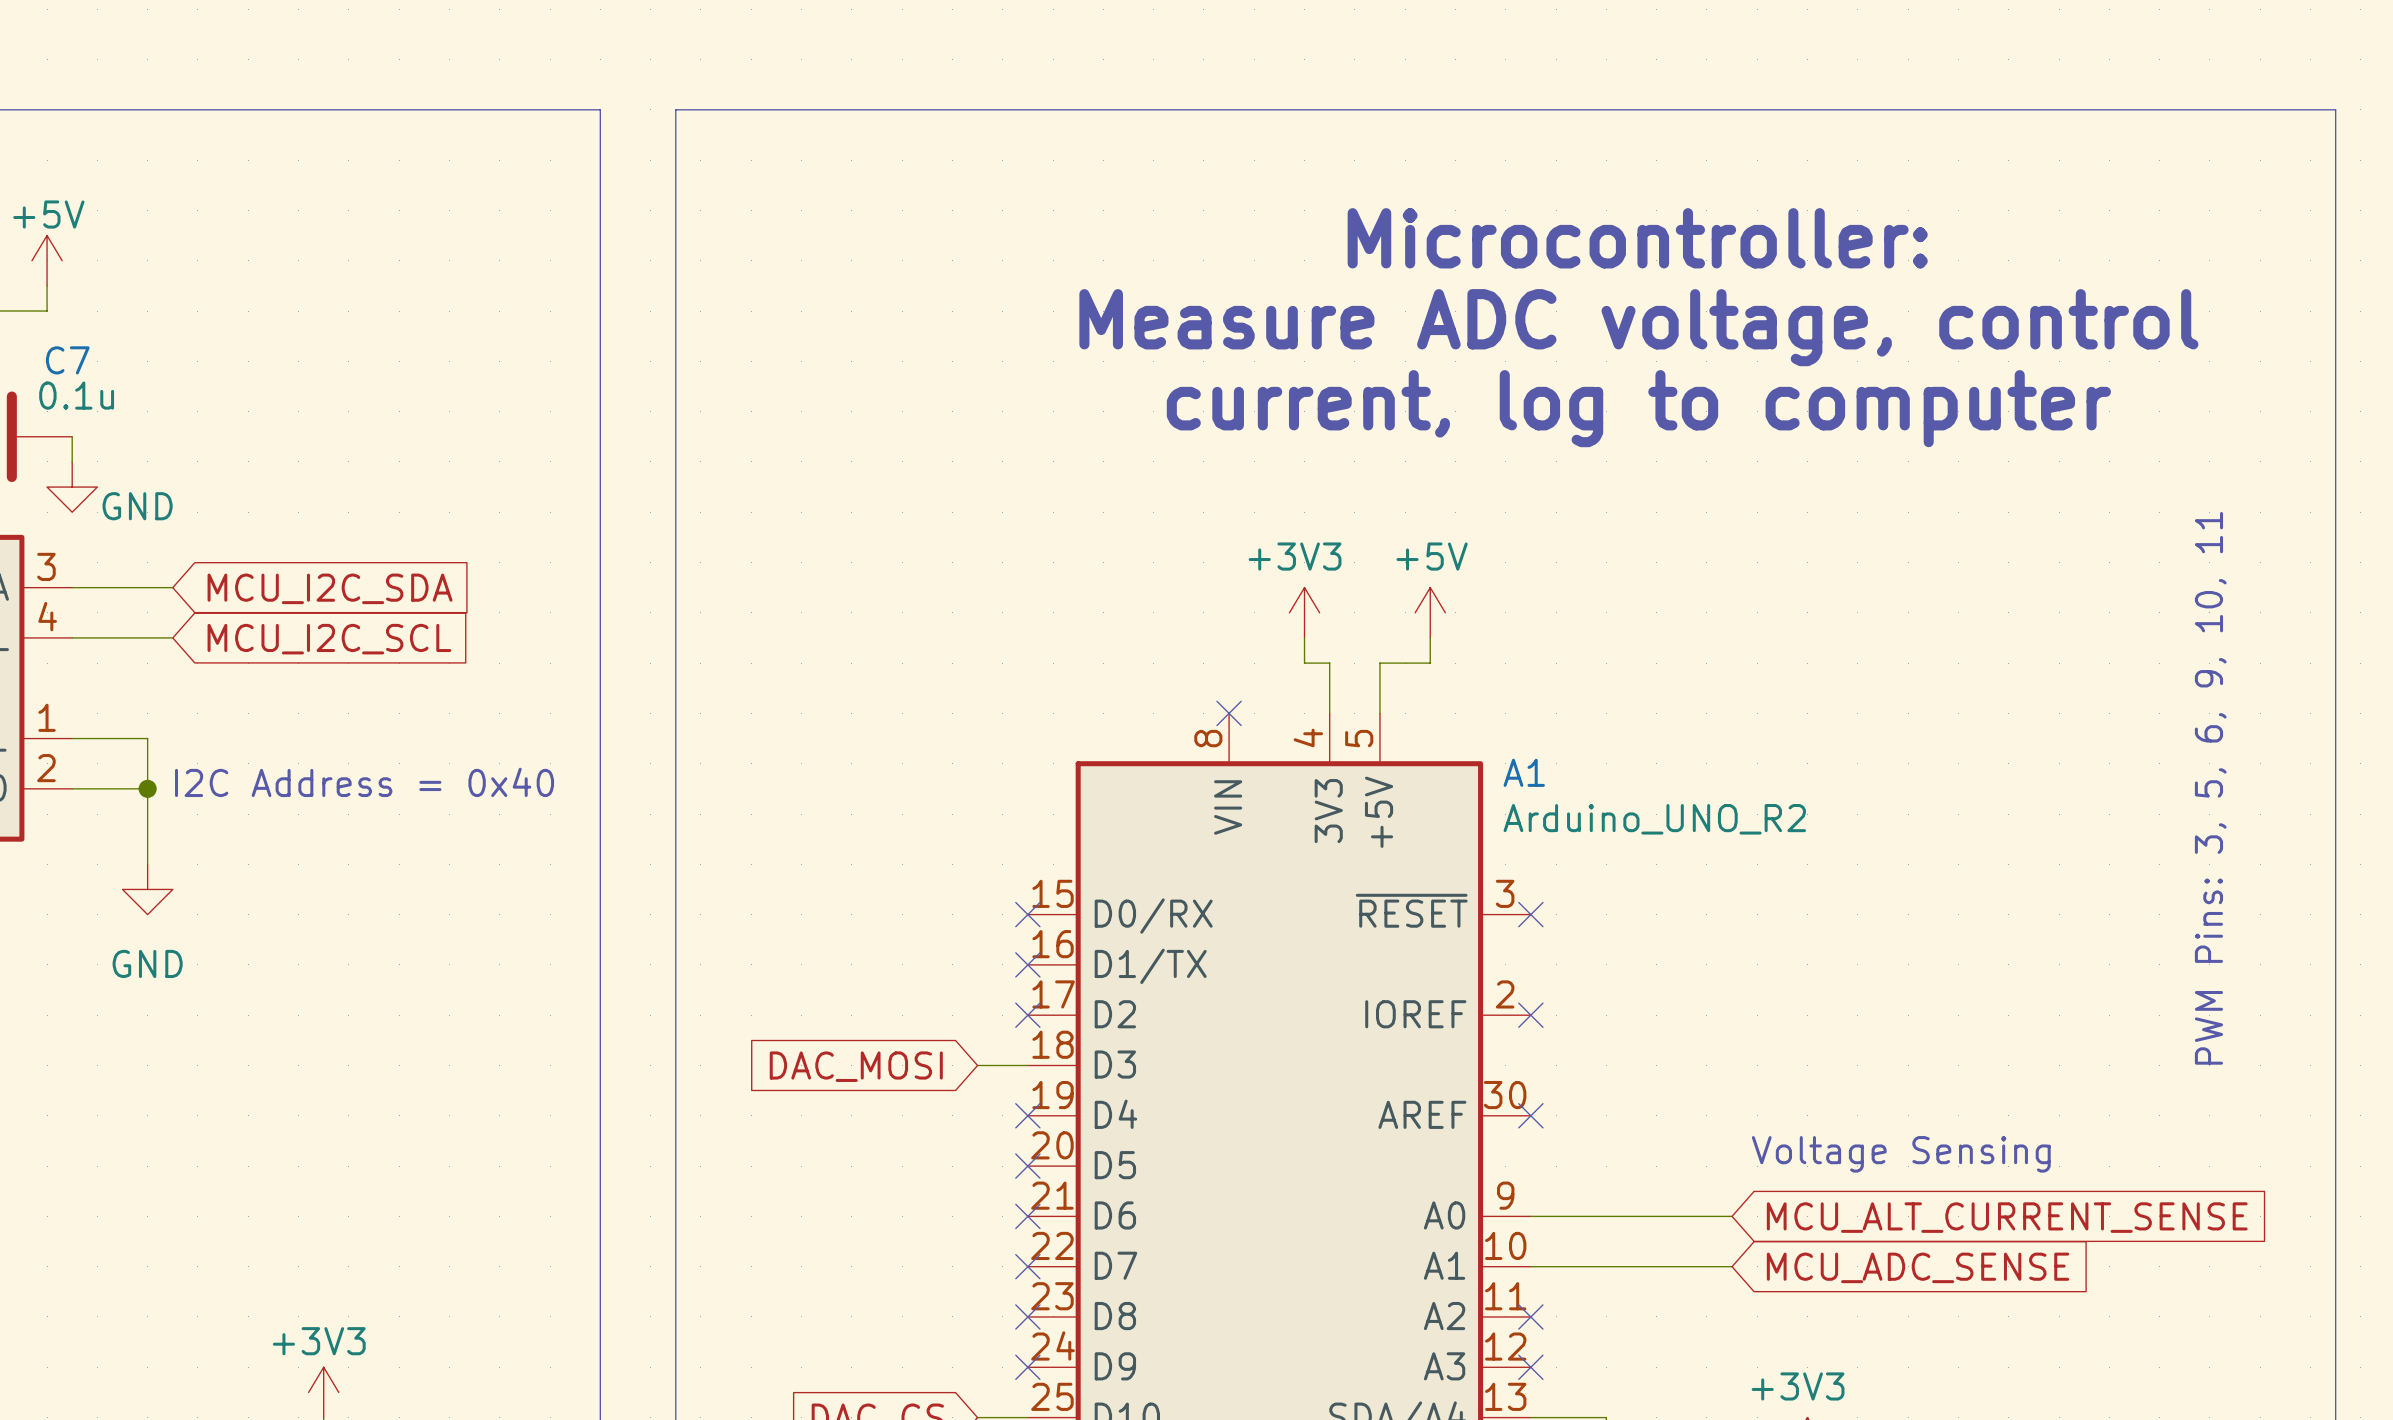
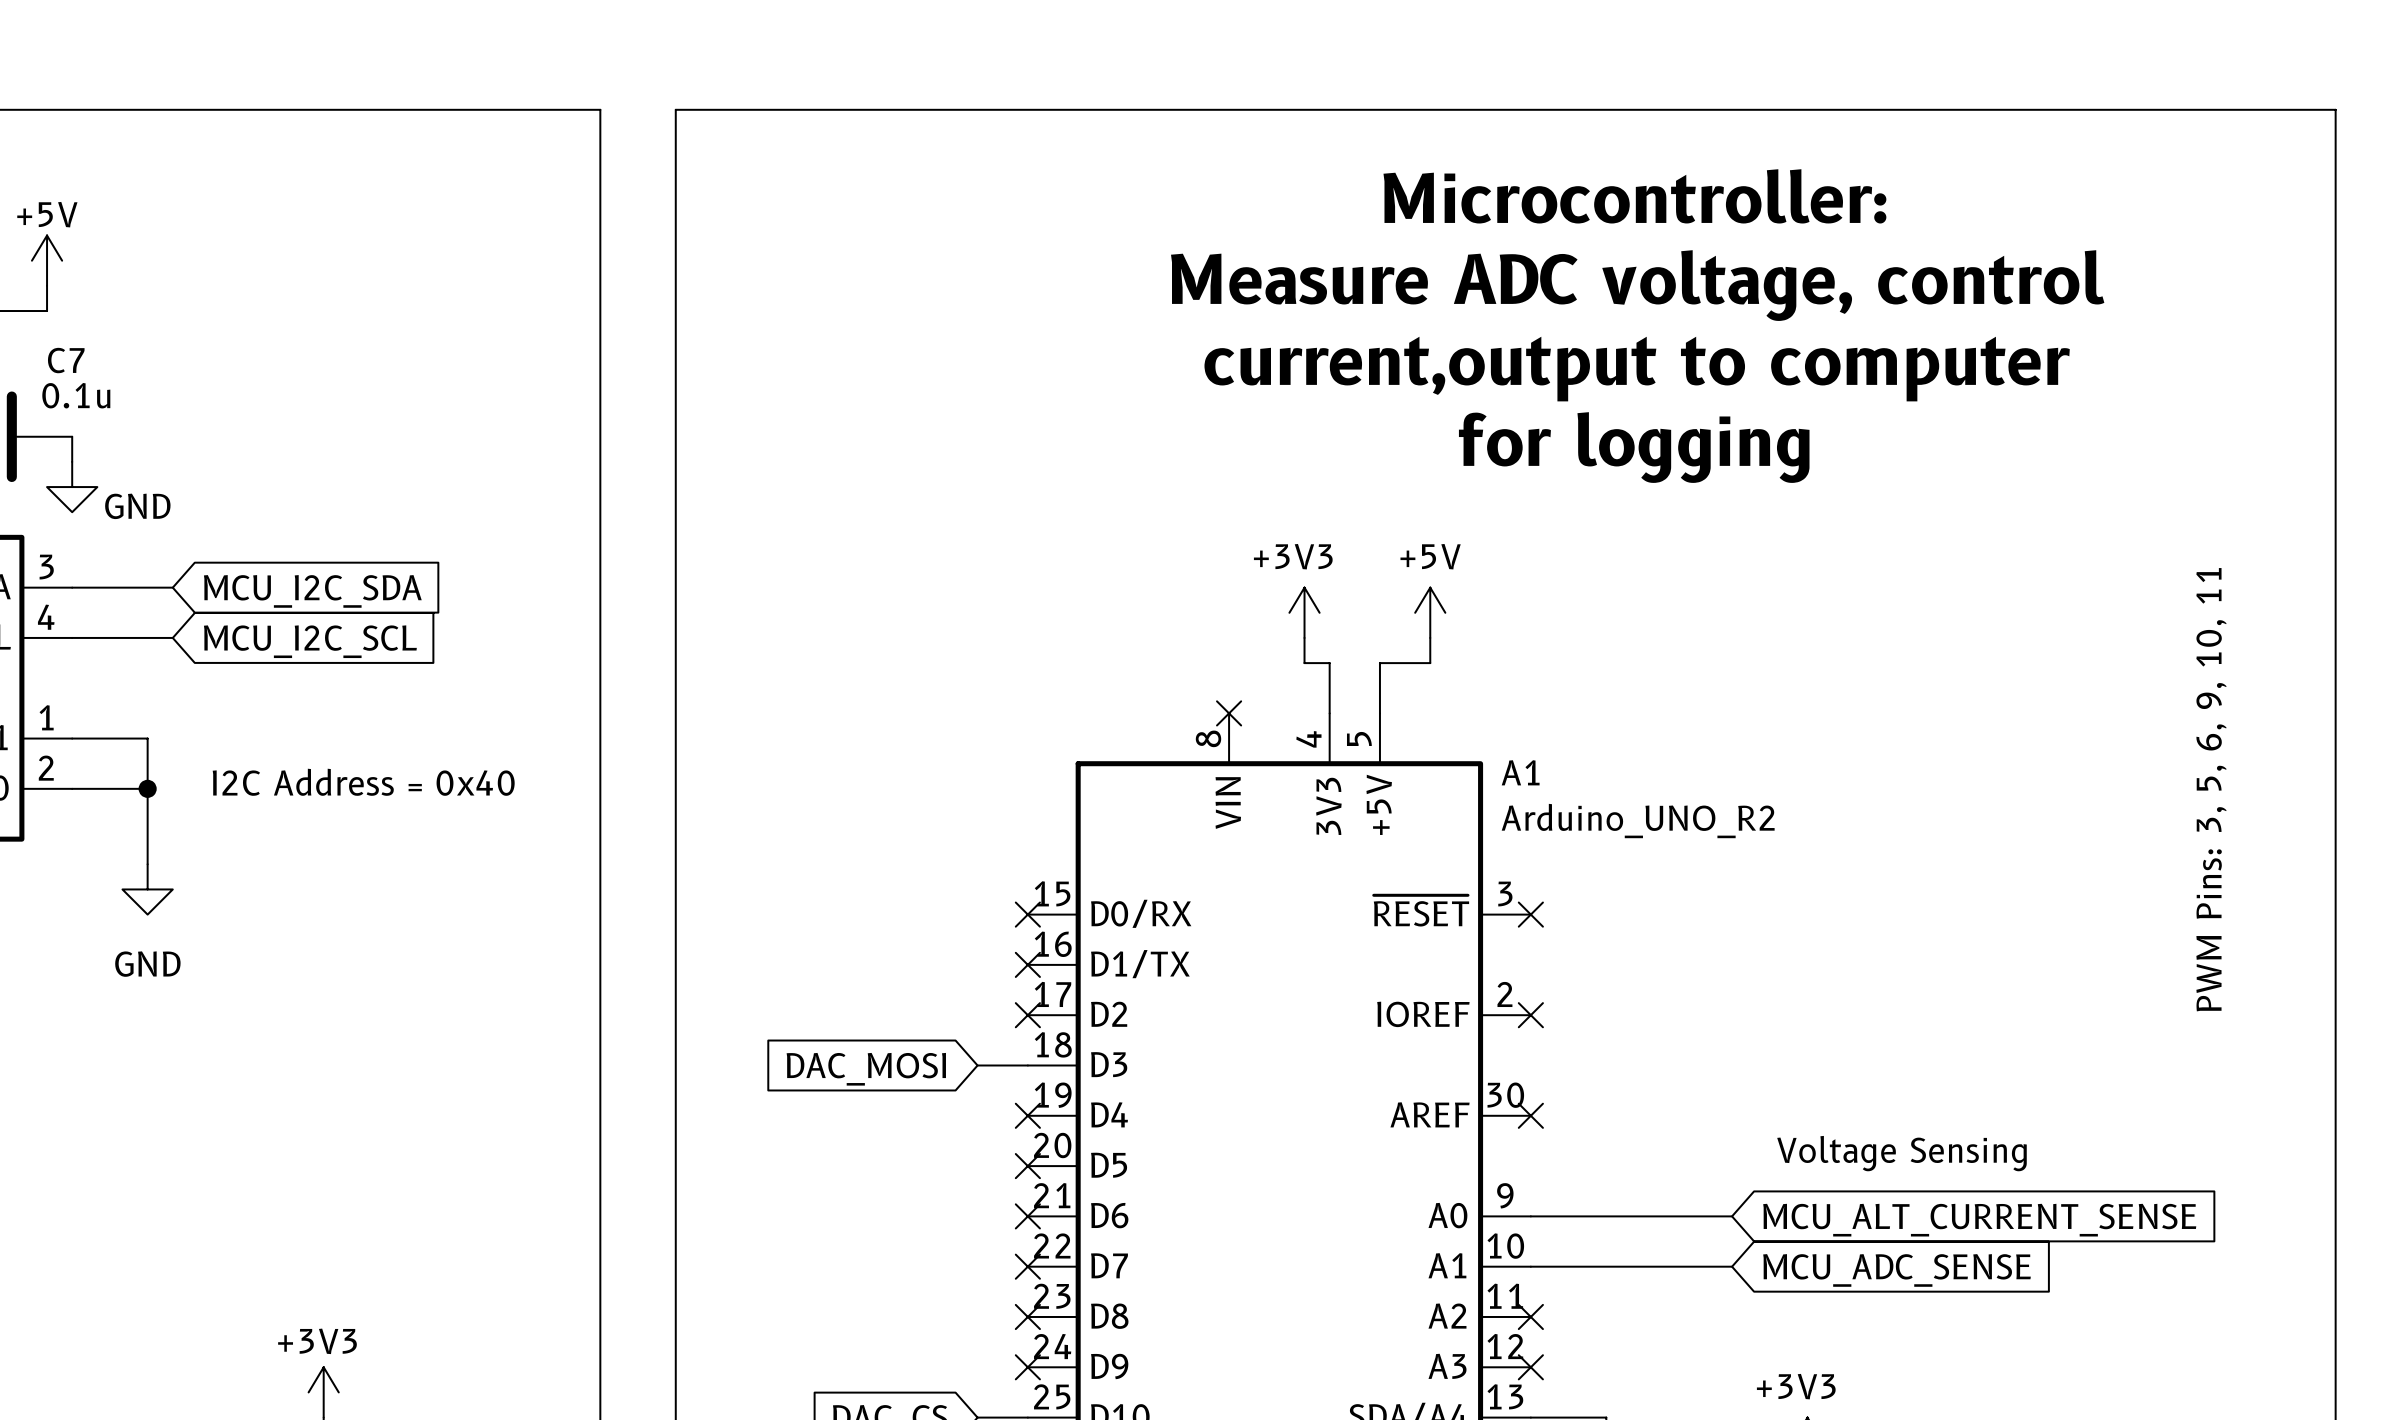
text position: Microcontroller: (1637, 238) -> Microcontroller: (1634, 196)
text position: Measure ADC voltage, control (1638, 327) -> Measure ADC voltage, control (1637, 285)
text: current, log to computer (1638, 408) -> current,output to computer (1637, 369)
text: none -> for logging (1634, 447)

